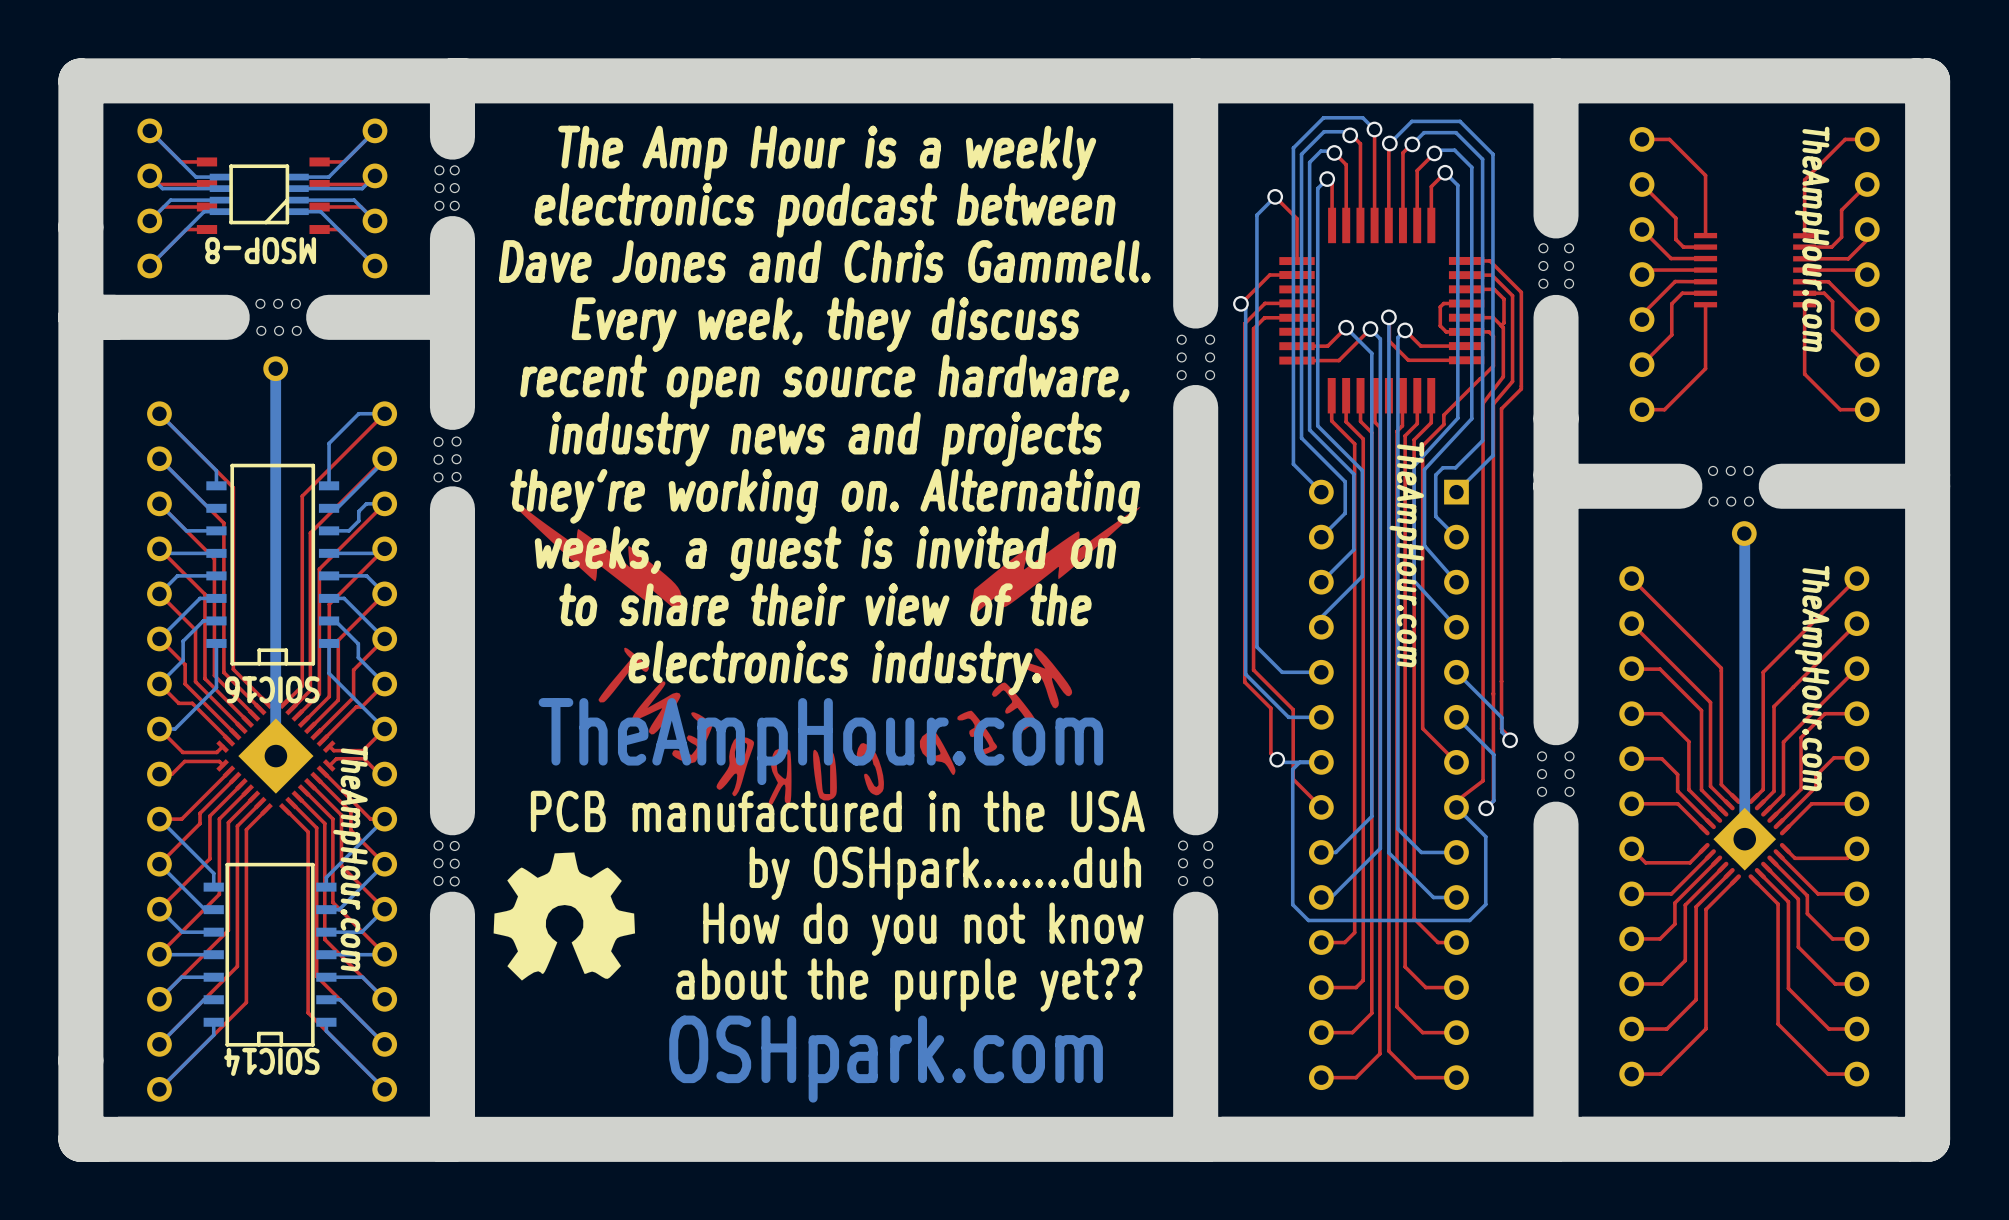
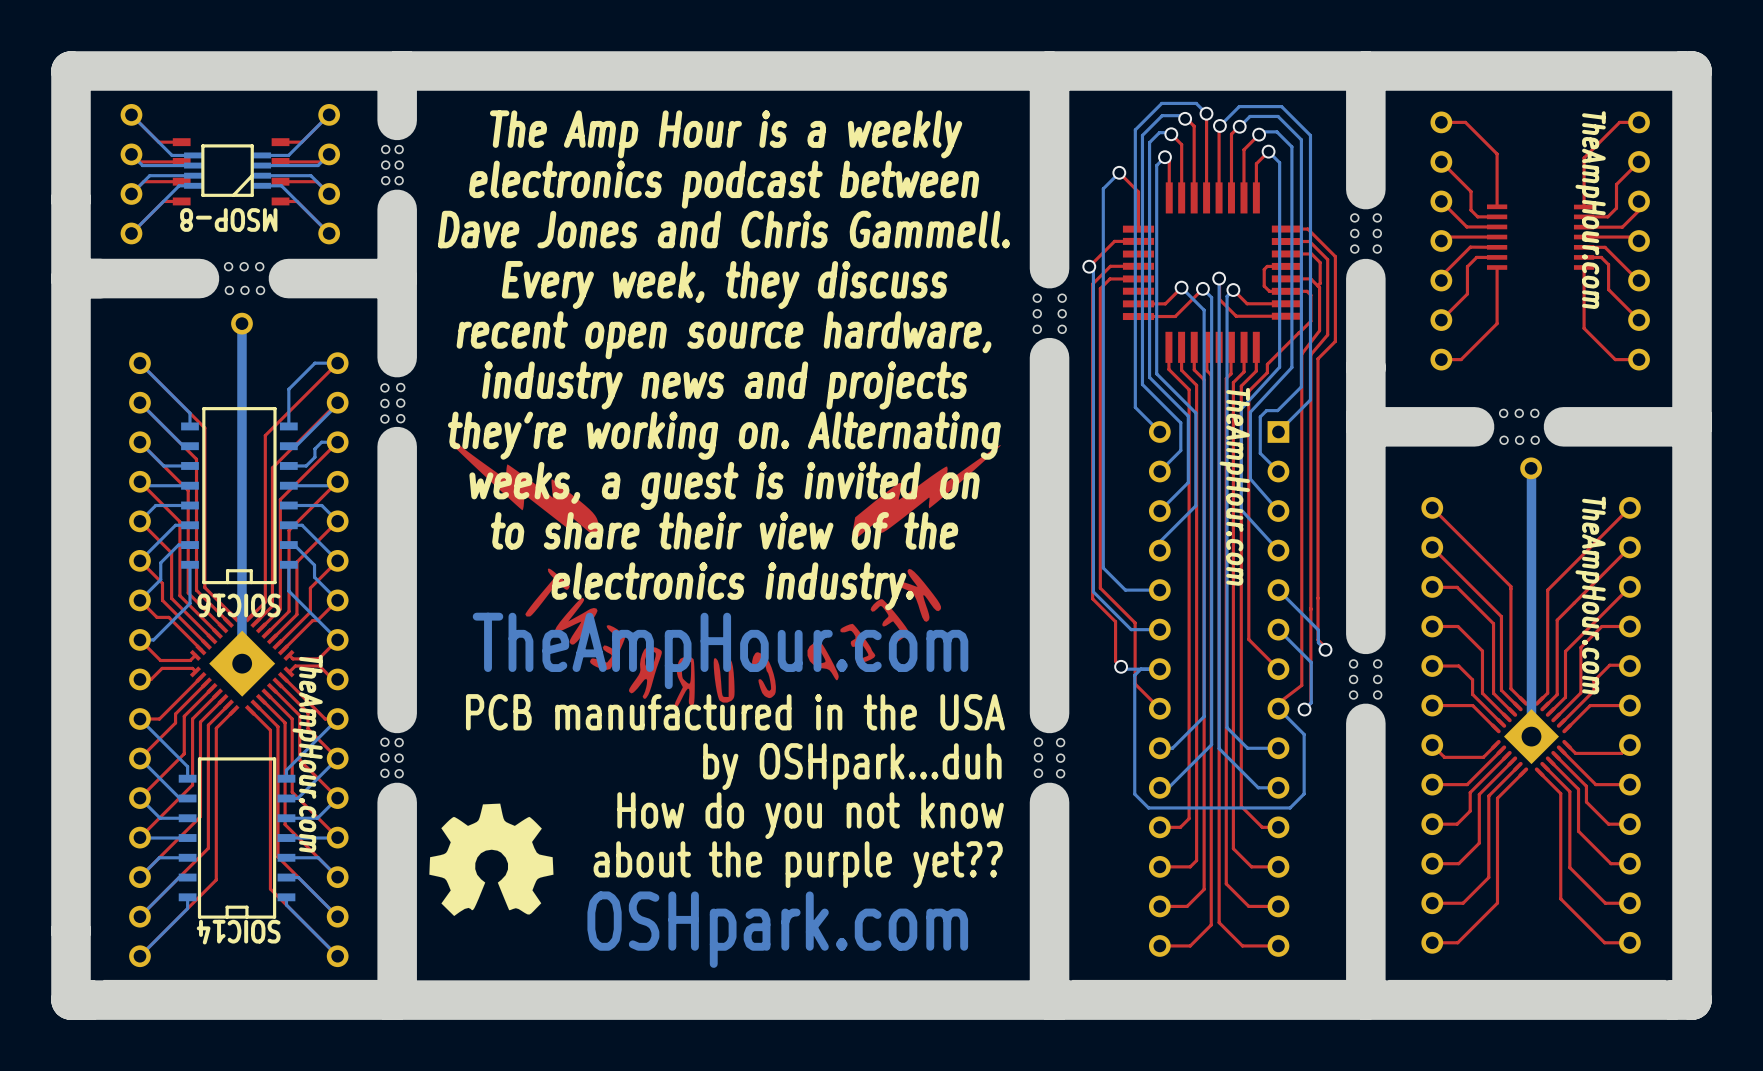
text: by OSHpark.......duh (945, 873) -> by OSHpark...duh (852, 766)
drawing position: (564, 916) -> (491, 859)

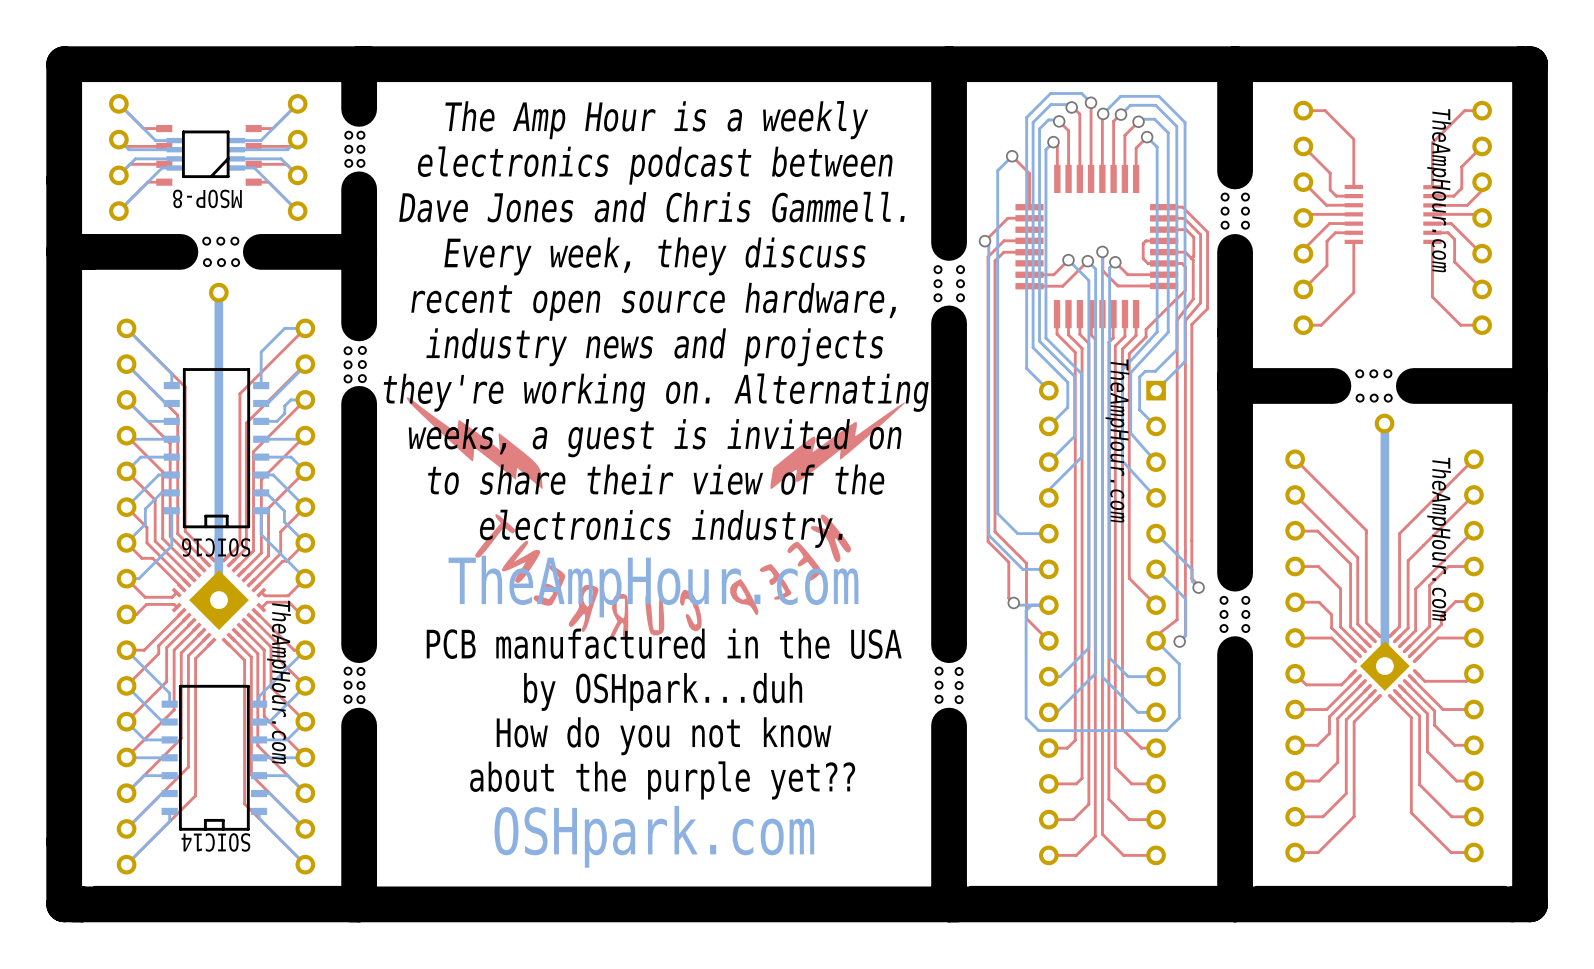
text position: PCB manufactured in the USA (735, 712) -> PCB manufactured in the USA (664, 643)
text position: by OSHpark...duh (852, 766) -> by OSHpark...duh (663, 691)
drawing: [429, 803, 554, 917] -> none
text position: How do you not know (810, 815) -> How do you not know (664, 736)
text position: about the purple yet?? (798, 864) -> about the purple yet?? (662, 780)
text position: OSHpark.com (777, 929) -> OSHpark.com (654, 836)

